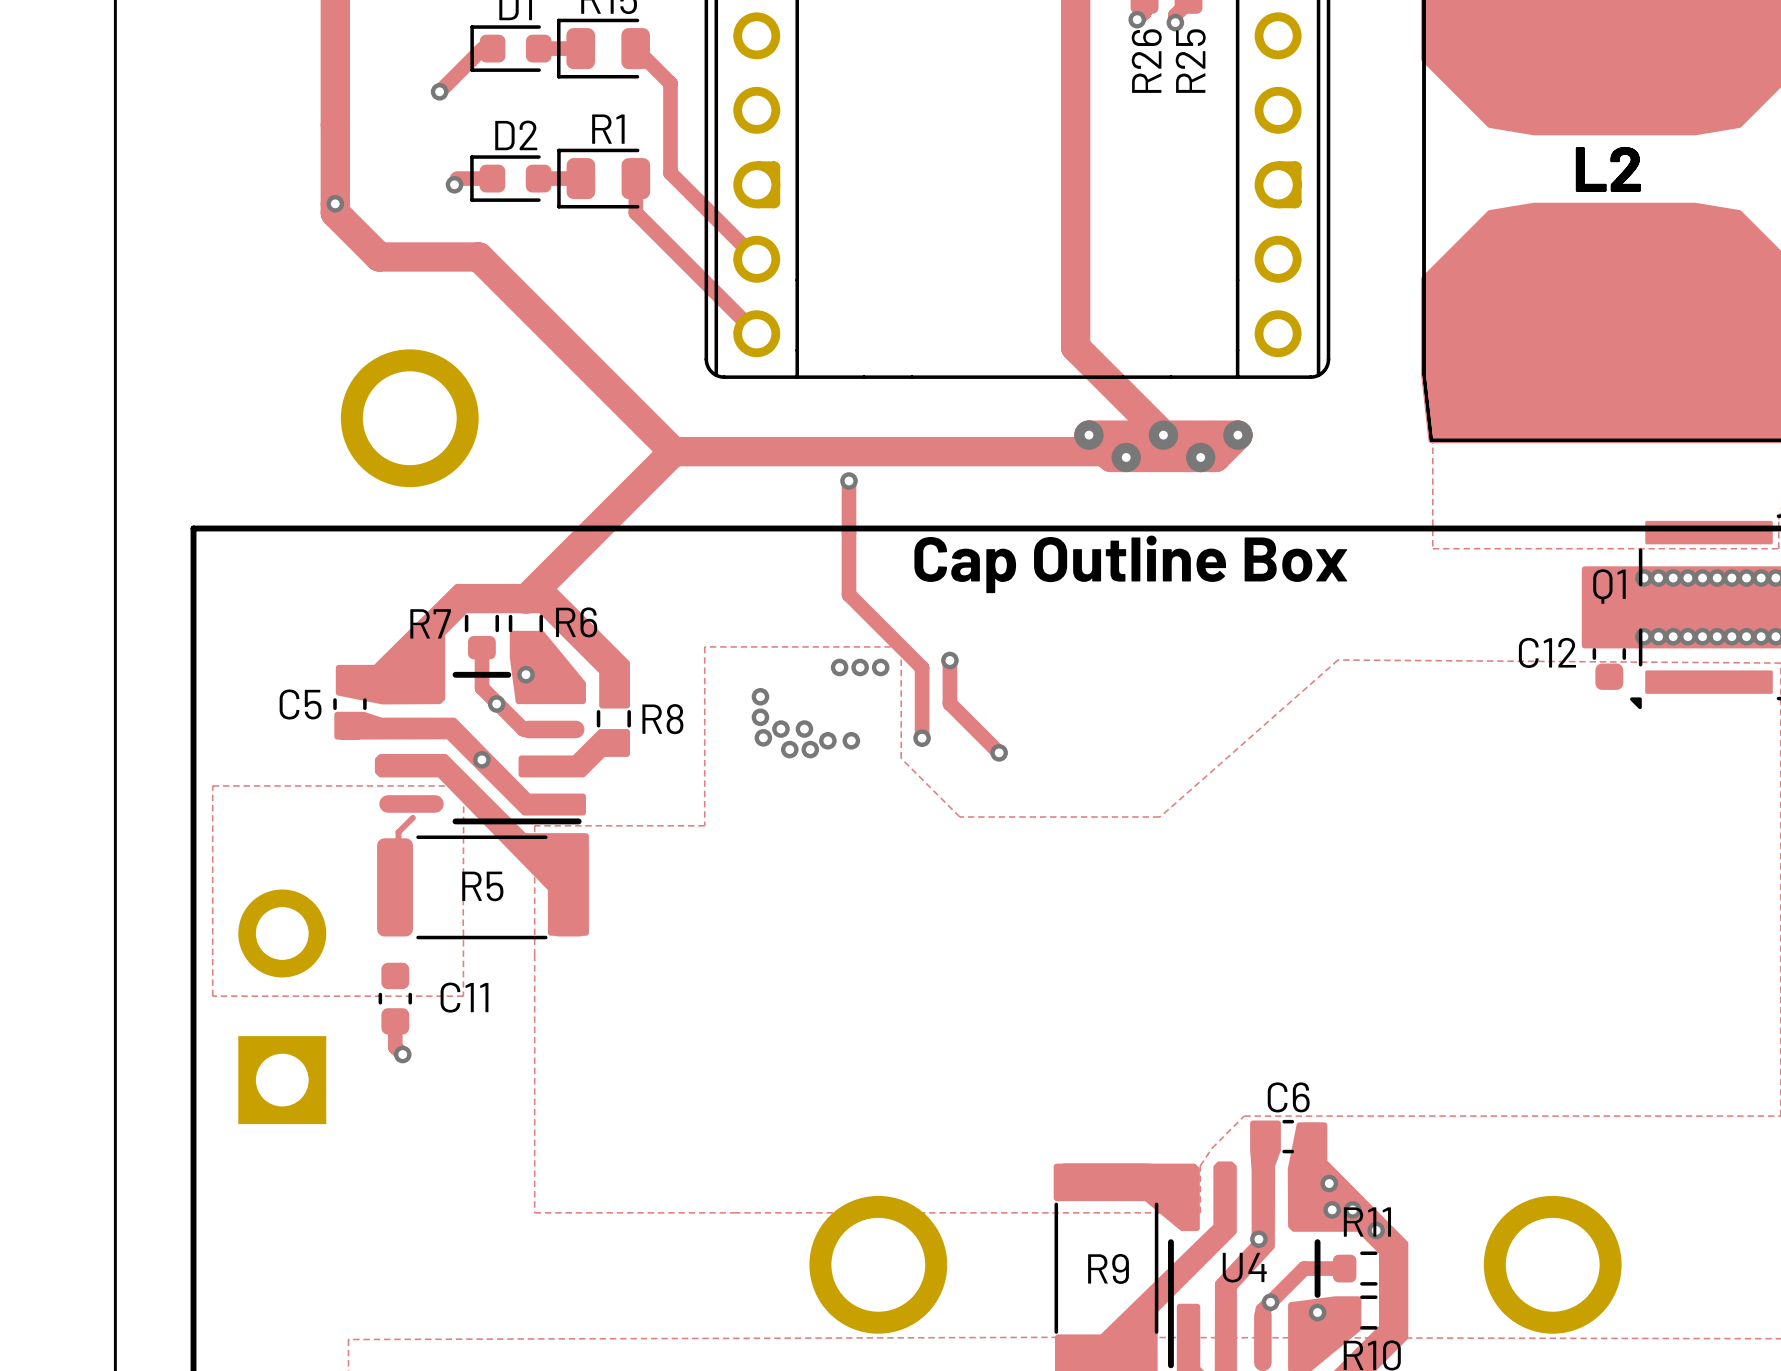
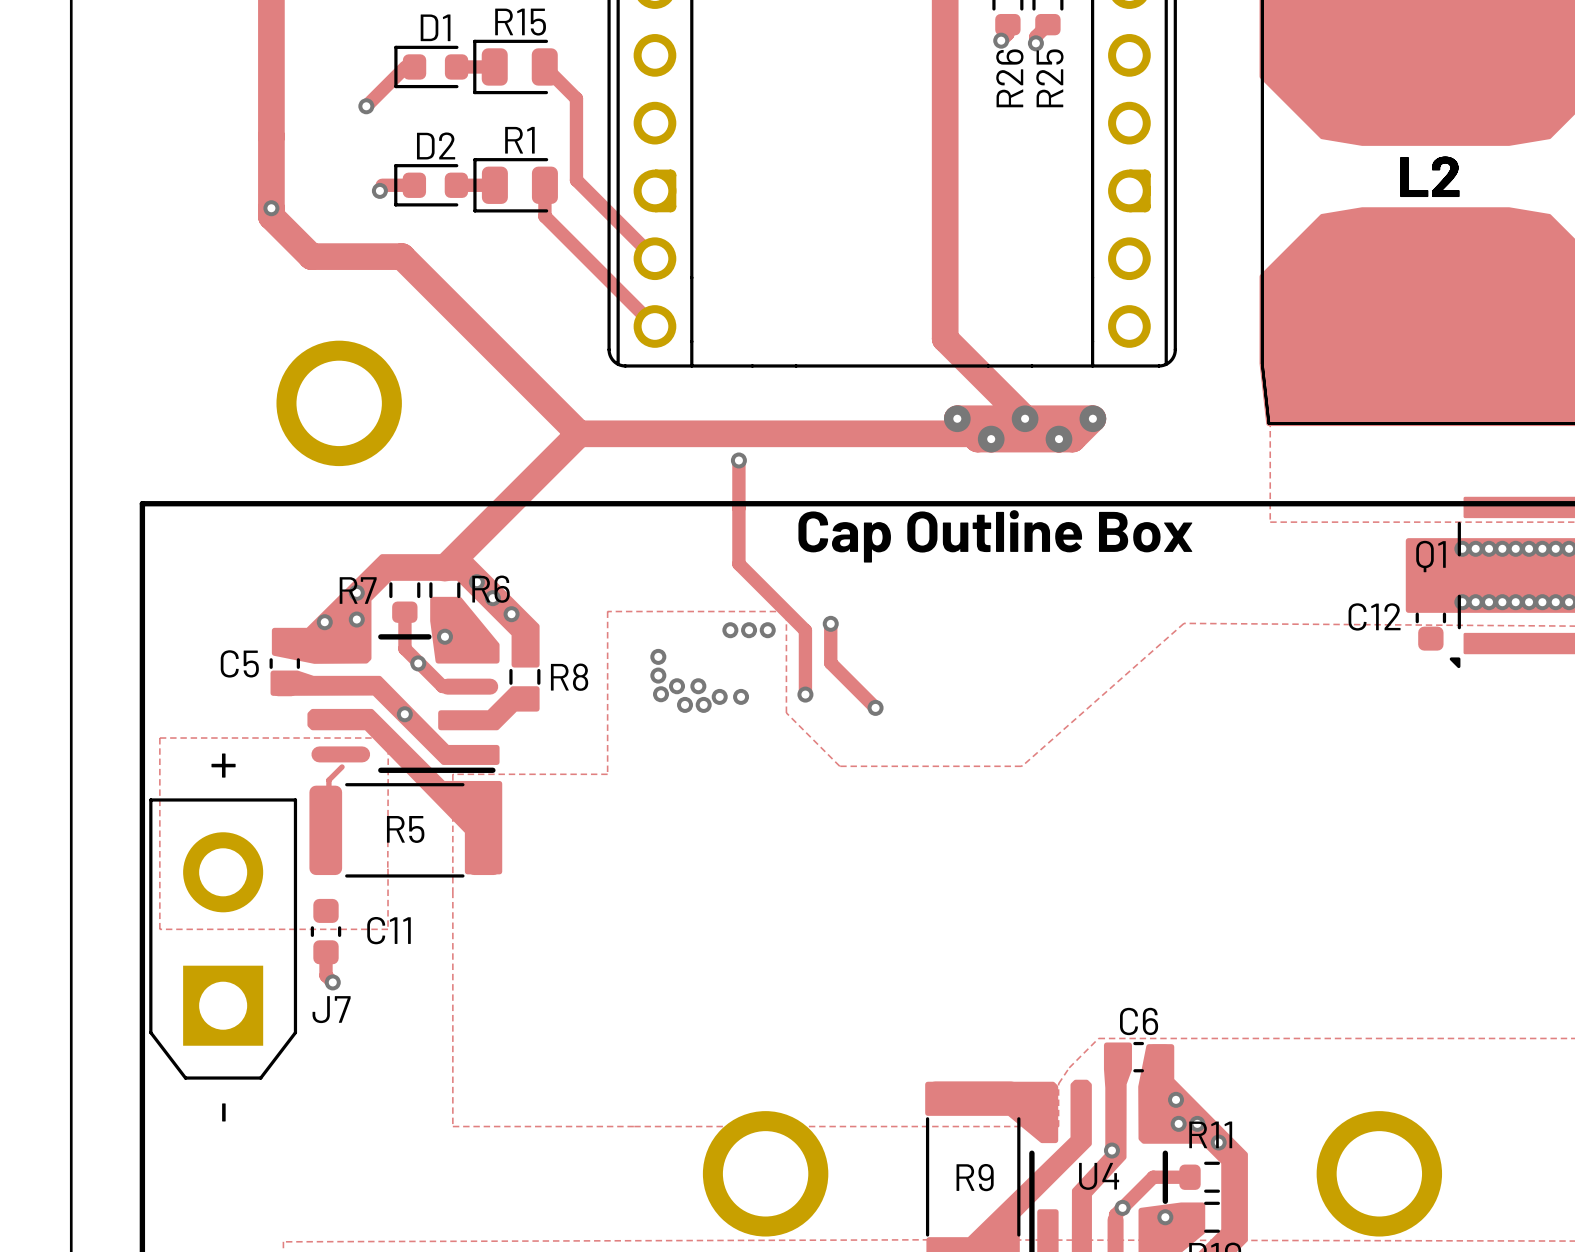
via: none -> (476, 582)
via: none -> (356, 592)
via: none -> (492, 598)
via: none -> (511, 614)
via: none -> (356, 619)
via: none -> (324, 622)
J7 side: bottom (282, 1006) -> top (223, 939)

